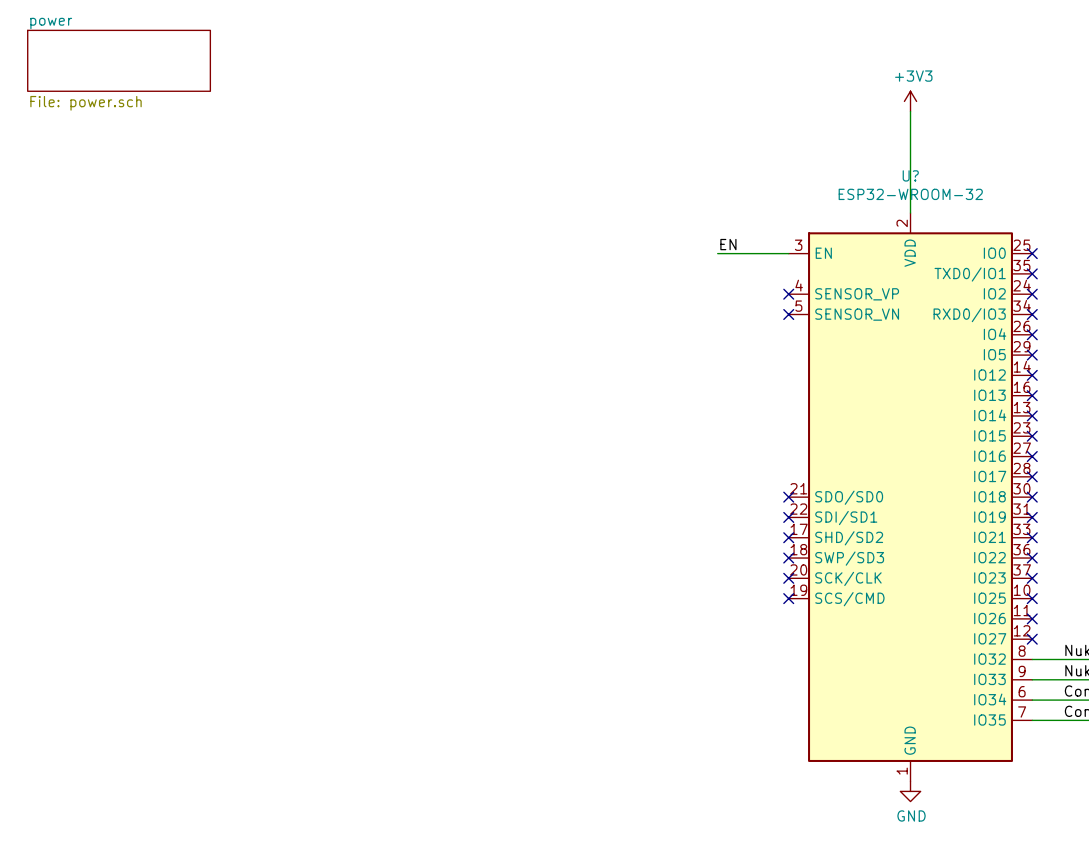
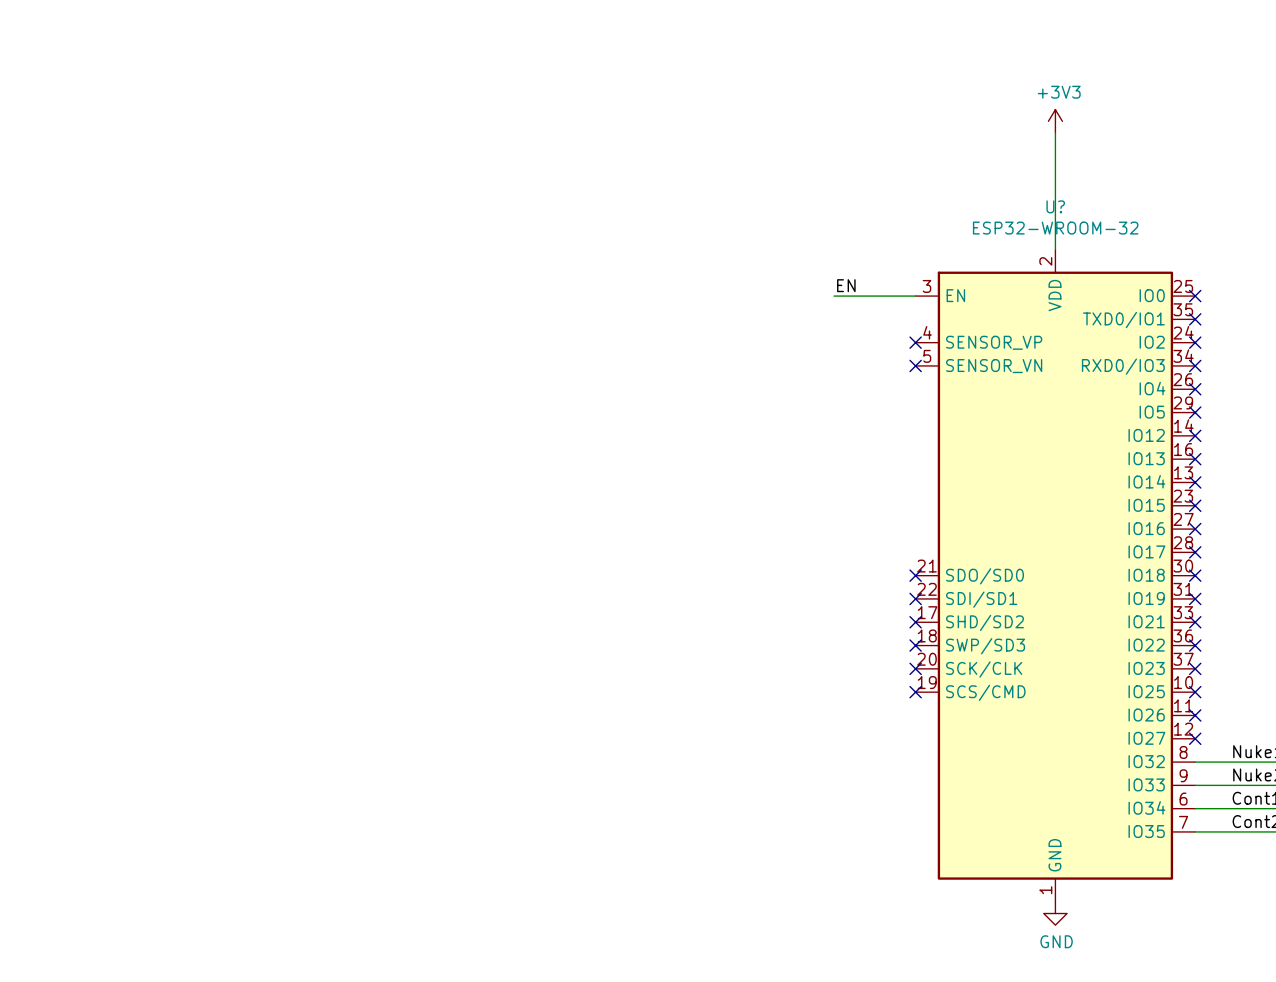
sheet power: File: power.sch (119, 60) -> none

